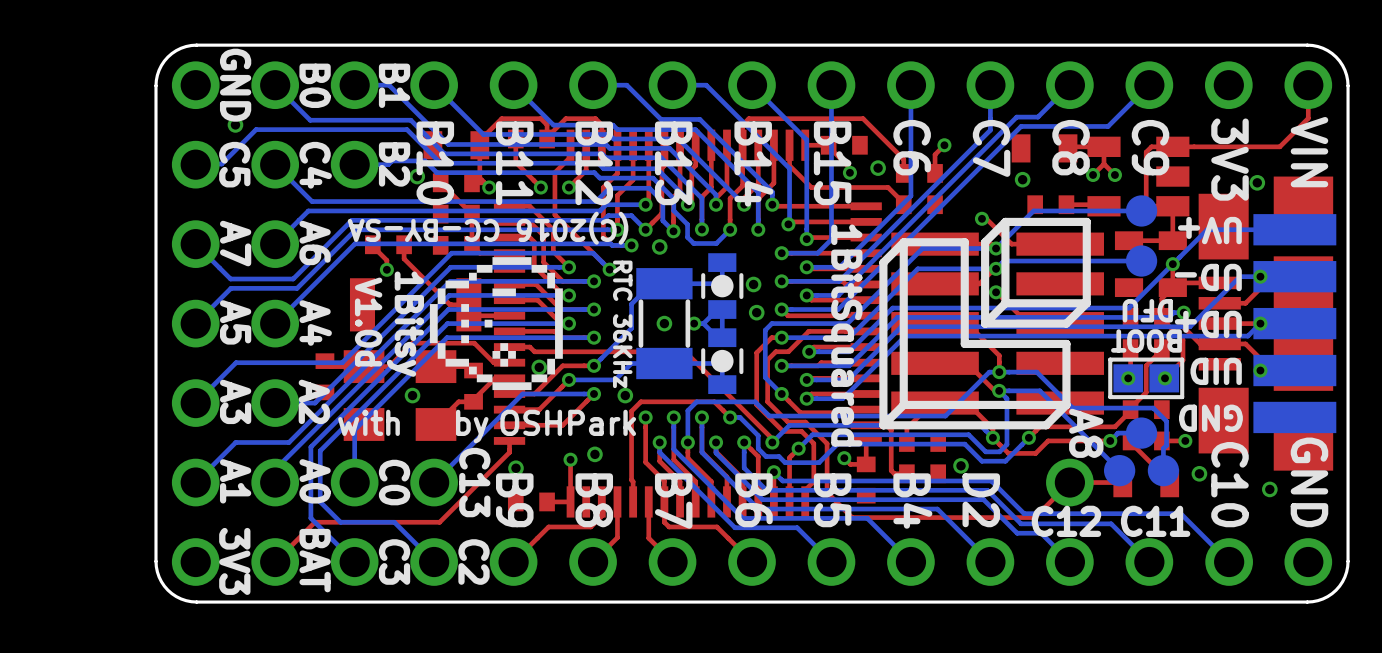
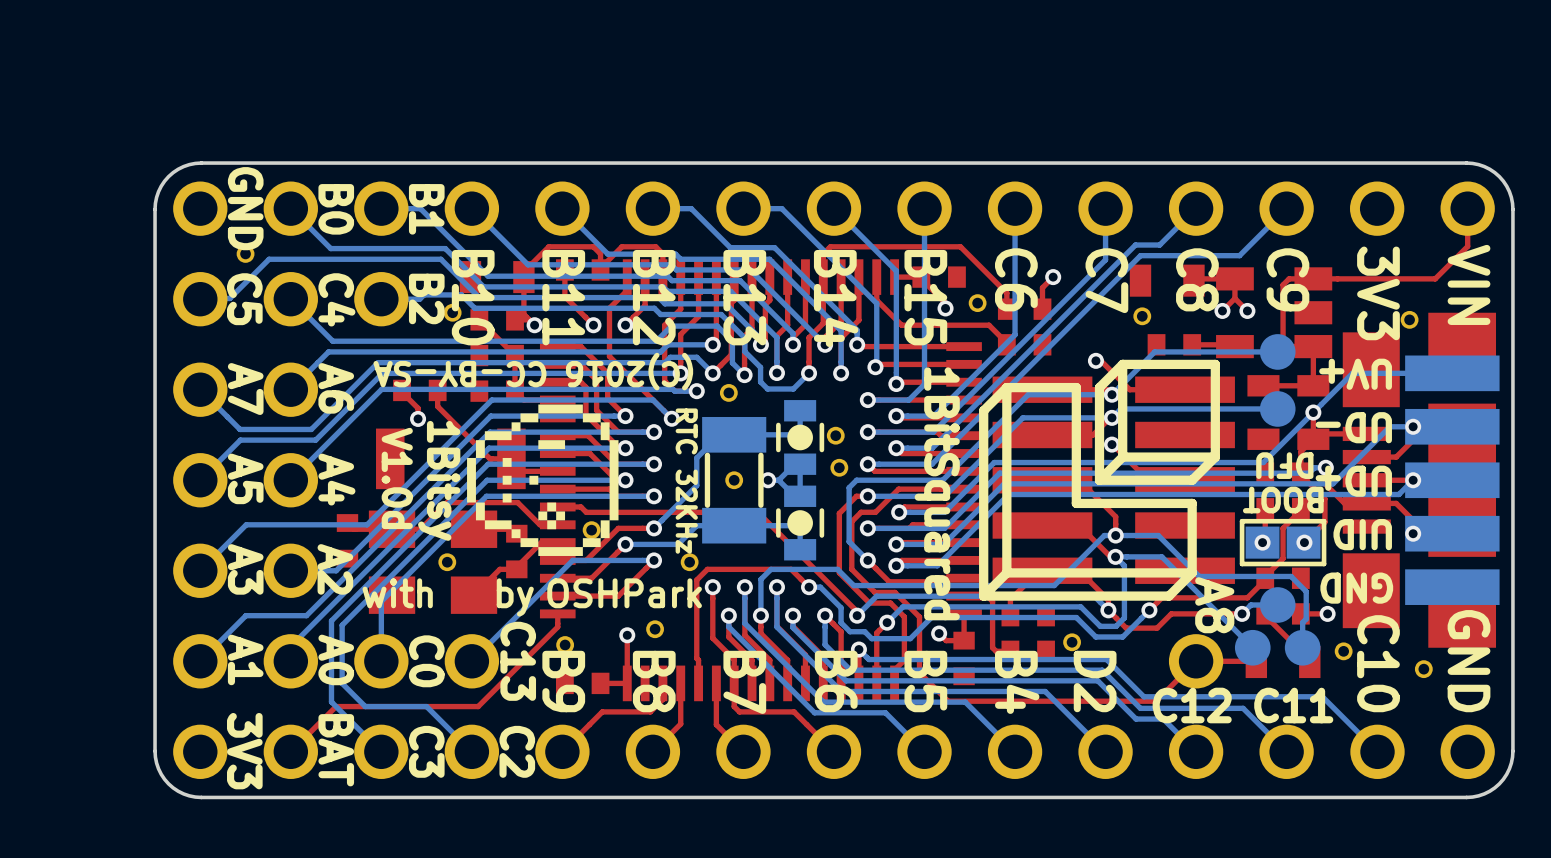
text: RTC 36KHz (622, 324) -> RTC 32KHz (686, 481)

